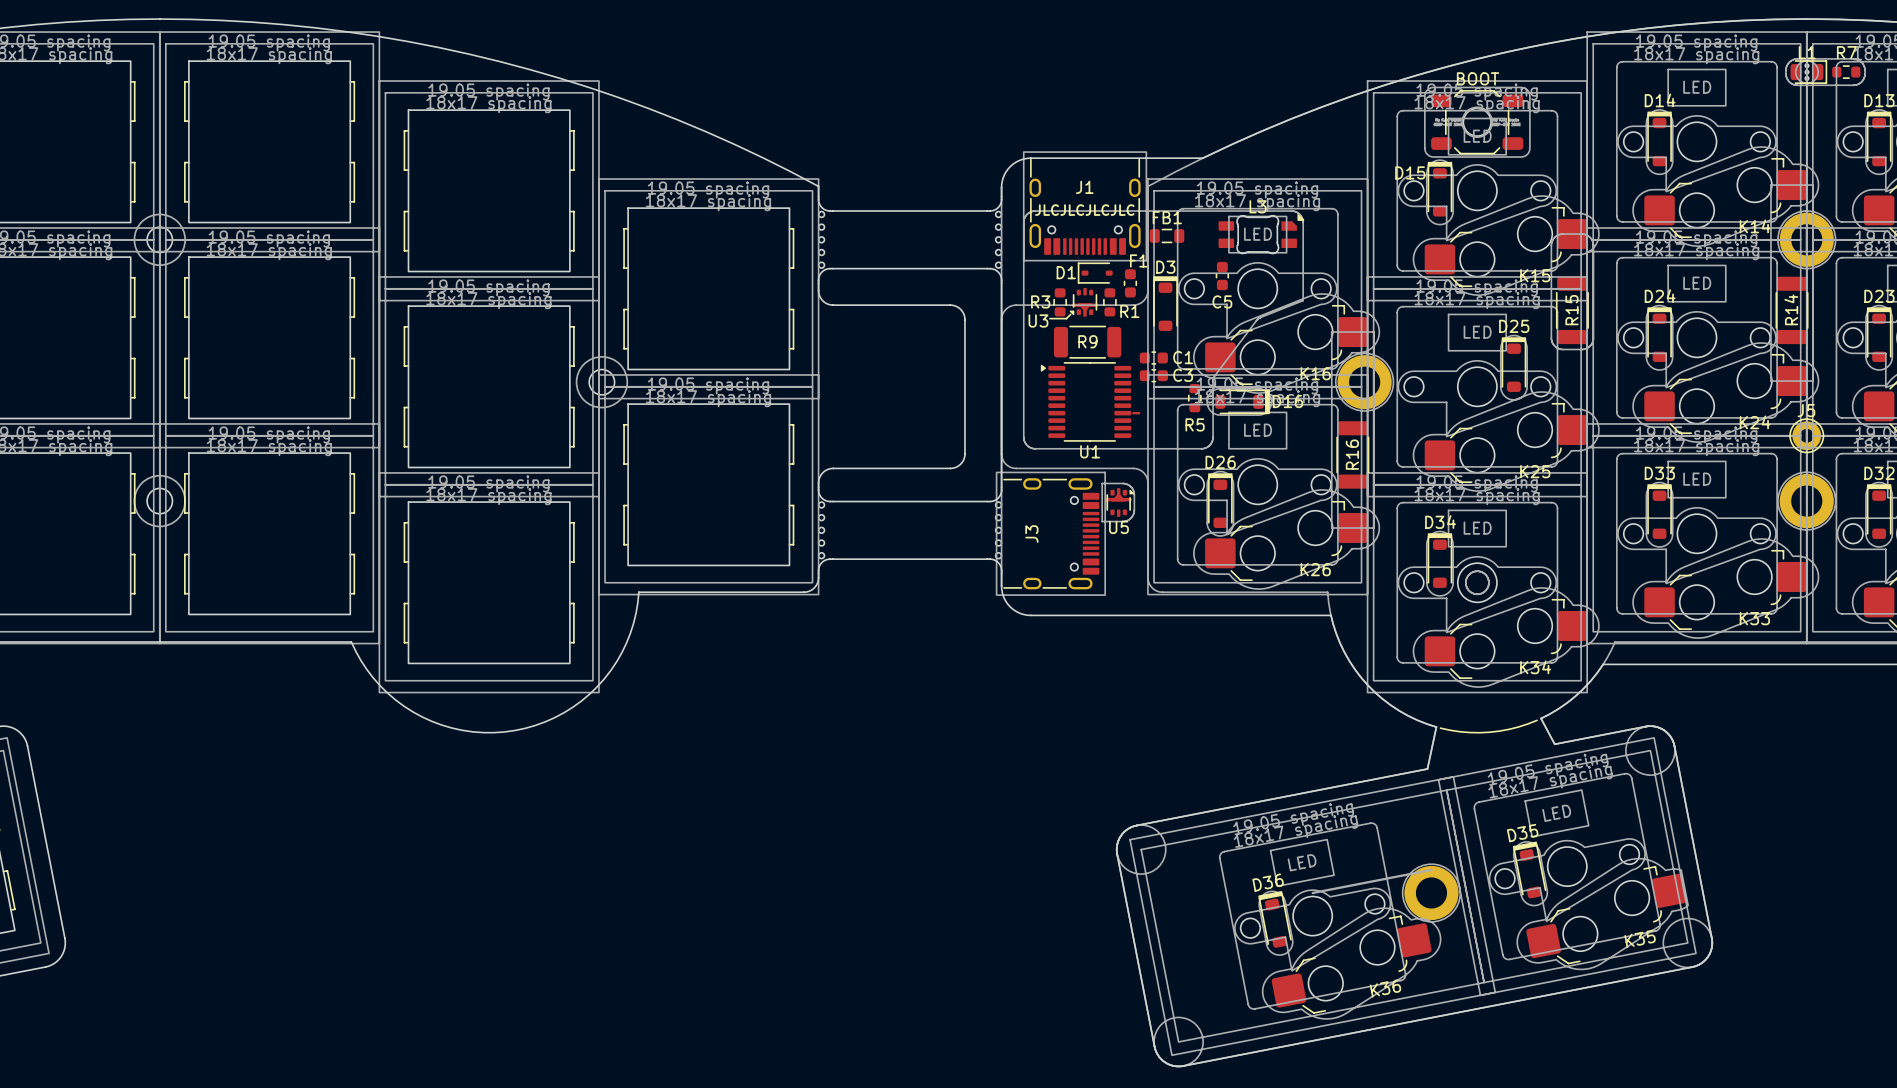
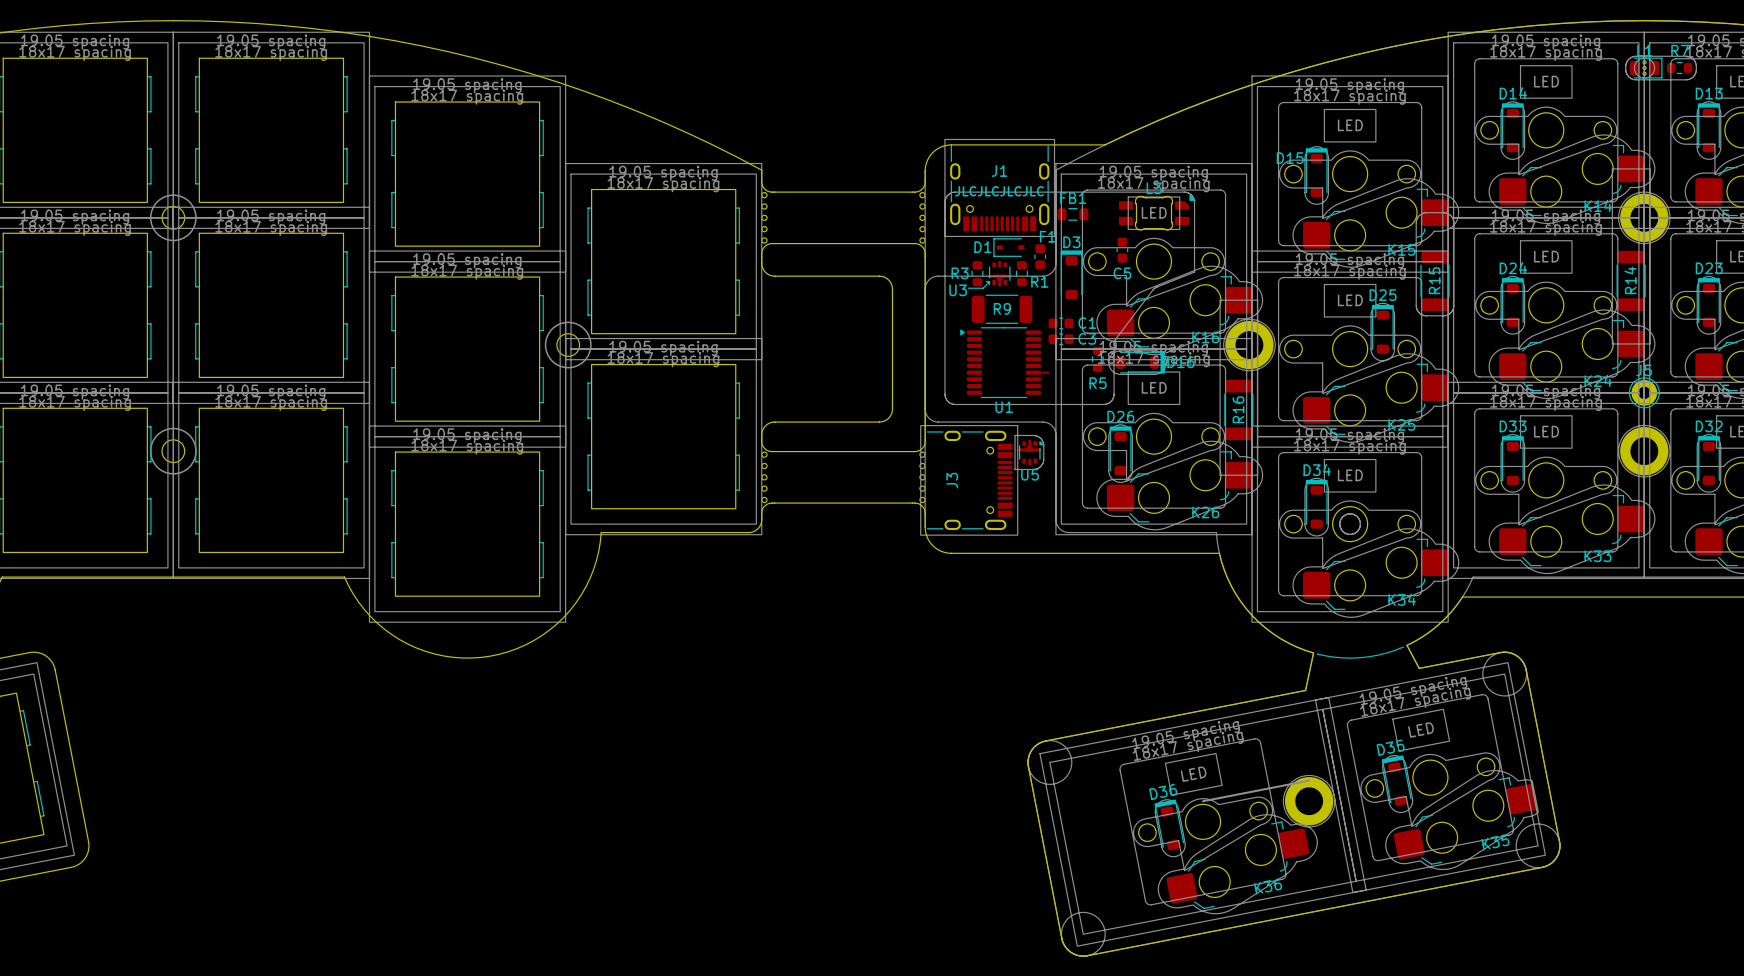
part: BOOT (1477, 122) -> none

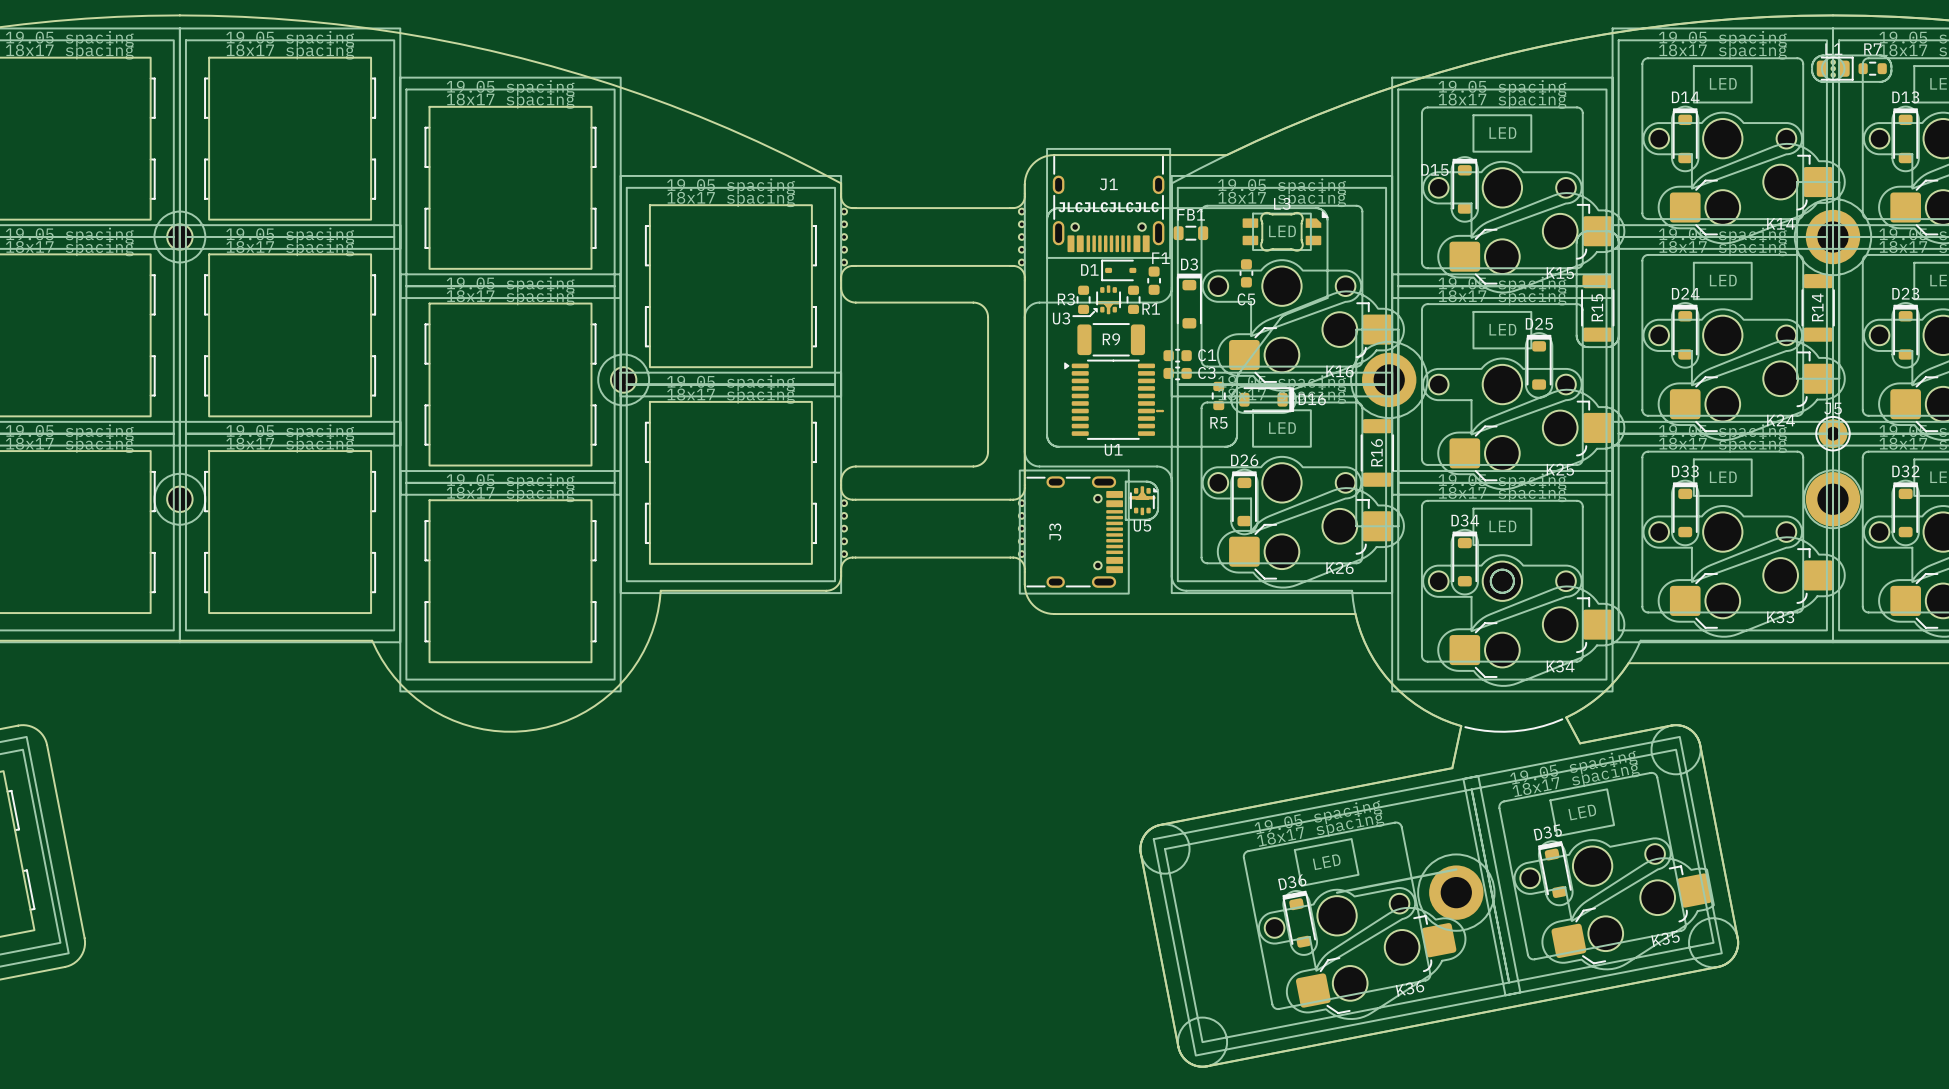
part footprint: [1618, 191, 1671, 245] -> [1794, 198, 1872, 276]
part footprint: [1223, 318, 1276, 372] -> [1350, 341, 1428, 419]
part footprint: [1282, 774, 1336, 828] -> [1417, 853, 1496, 932]

